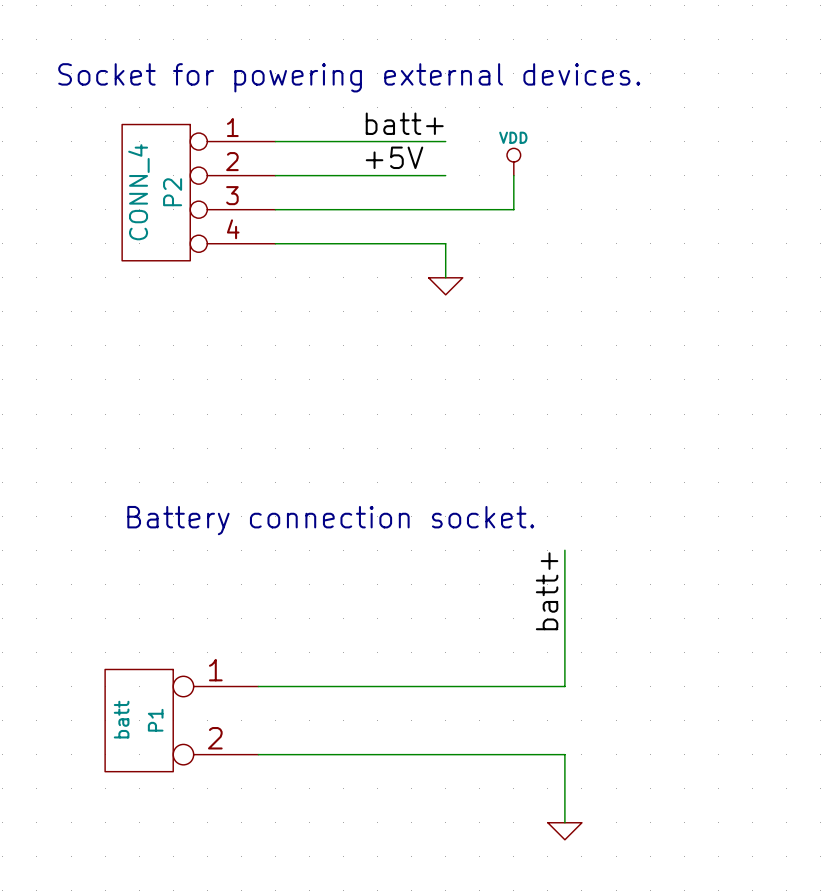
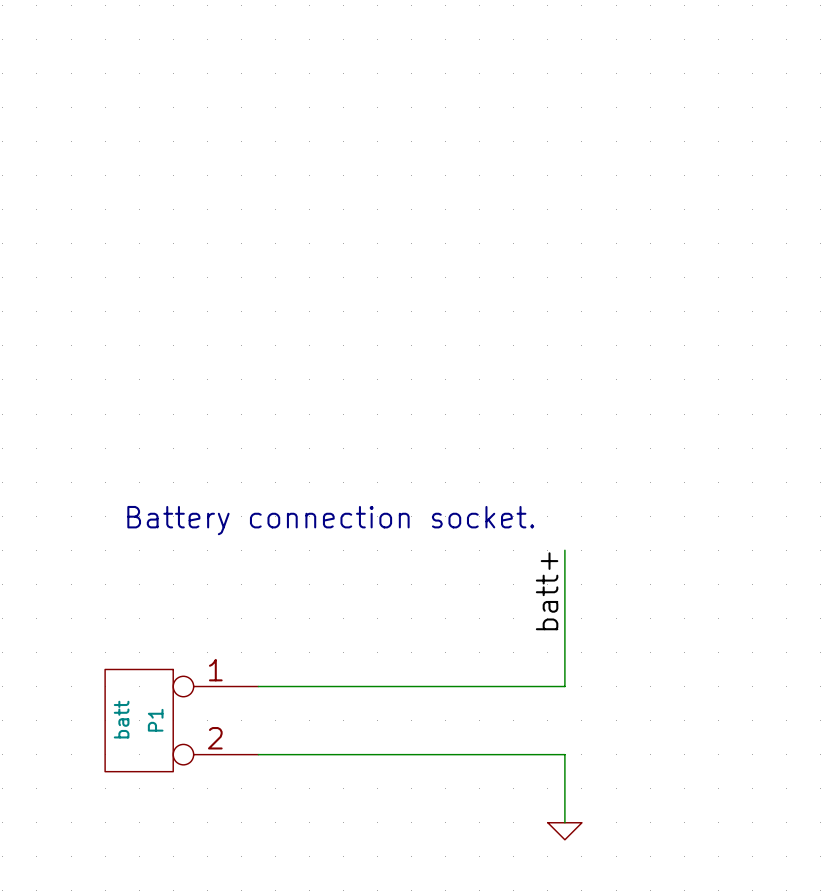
text: Socket for powering external devices. (349, 77) -> none
label: batt+ (404, 123) -> none
wire: (275, 141) (445, 141) -> none
label: +5V (394, 157) -> none
power symbol: VDD (513, 162) -> none
wire: (275, 175) (445, 175) -> none
wire: (513, 175) (513, 209) (275, 209) -> none
P2: CONN_4 (198, 192) -> none
wire: (275, 243) (445, 243) (445, 277) -> none
power symbol: (445, 286) -> none

